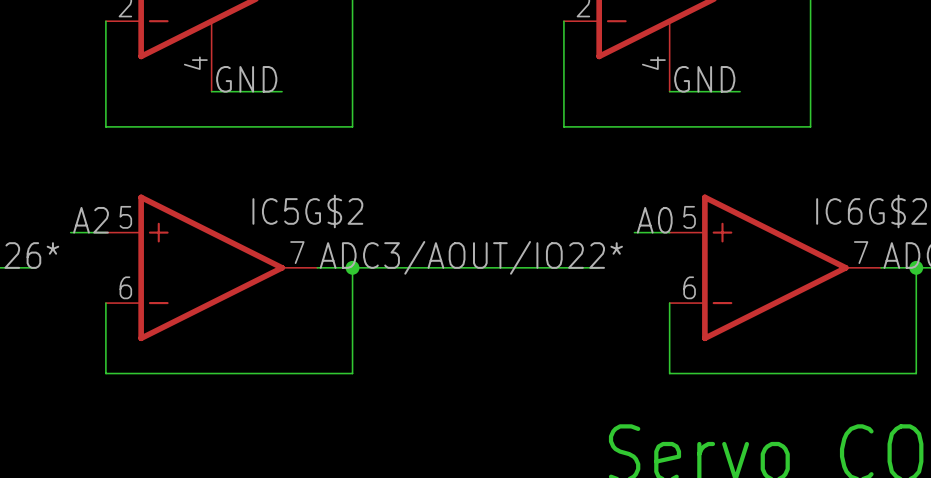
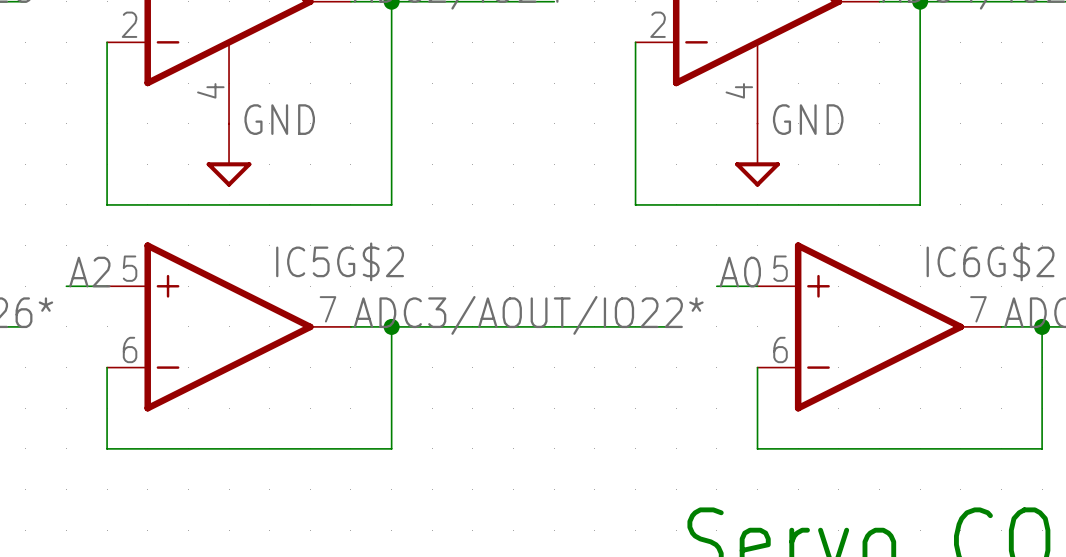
label: GND (246, 79) -> none
label: GND (704, 79) -> none
wire: (211, 91) (282, 91) -> none
wire: (669, 91) (740, 91) -> none
power symbol: none -> GND (229, 155)
power symbol: none -> GND (757, 155)
wire: (105, 126) (352, 126) -> (107, 164) (107, 204) (391, 204) (391, 164)
wire: (563, 126) (810, 126) -> (635, 164) (635, 204) (920, 204) (920, 164)

